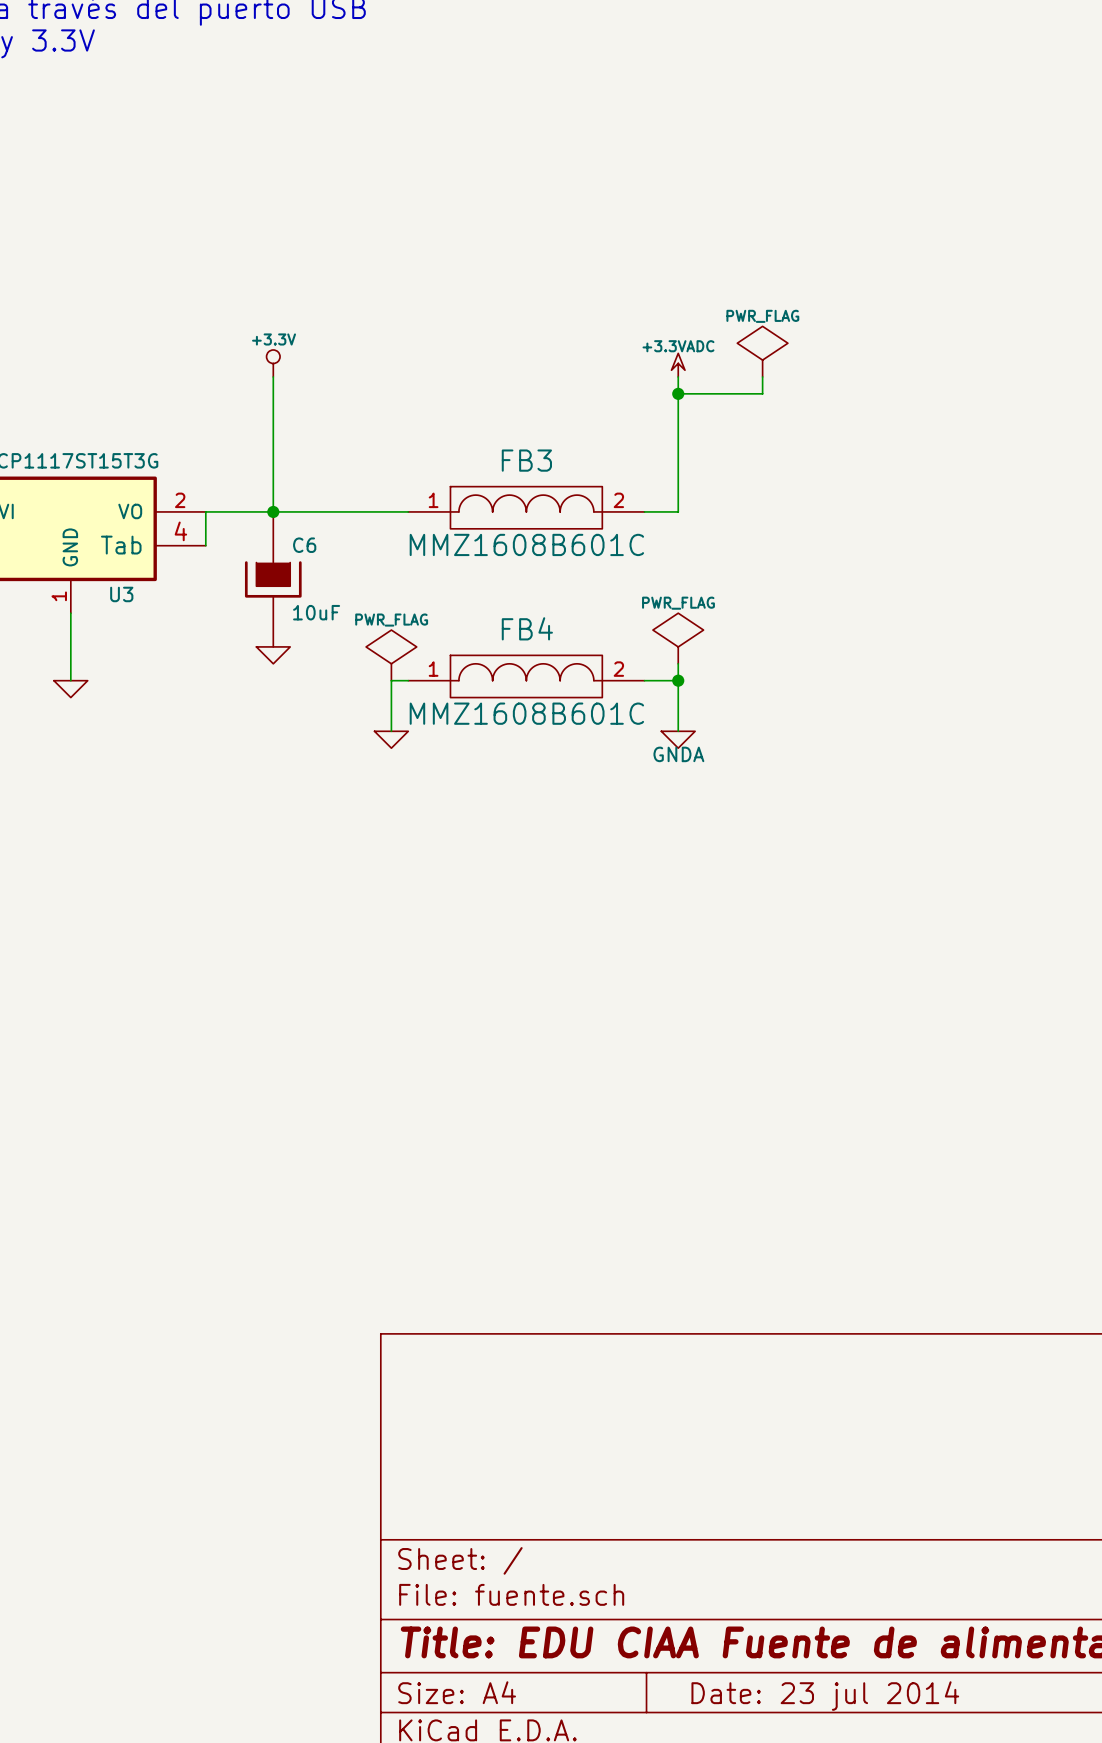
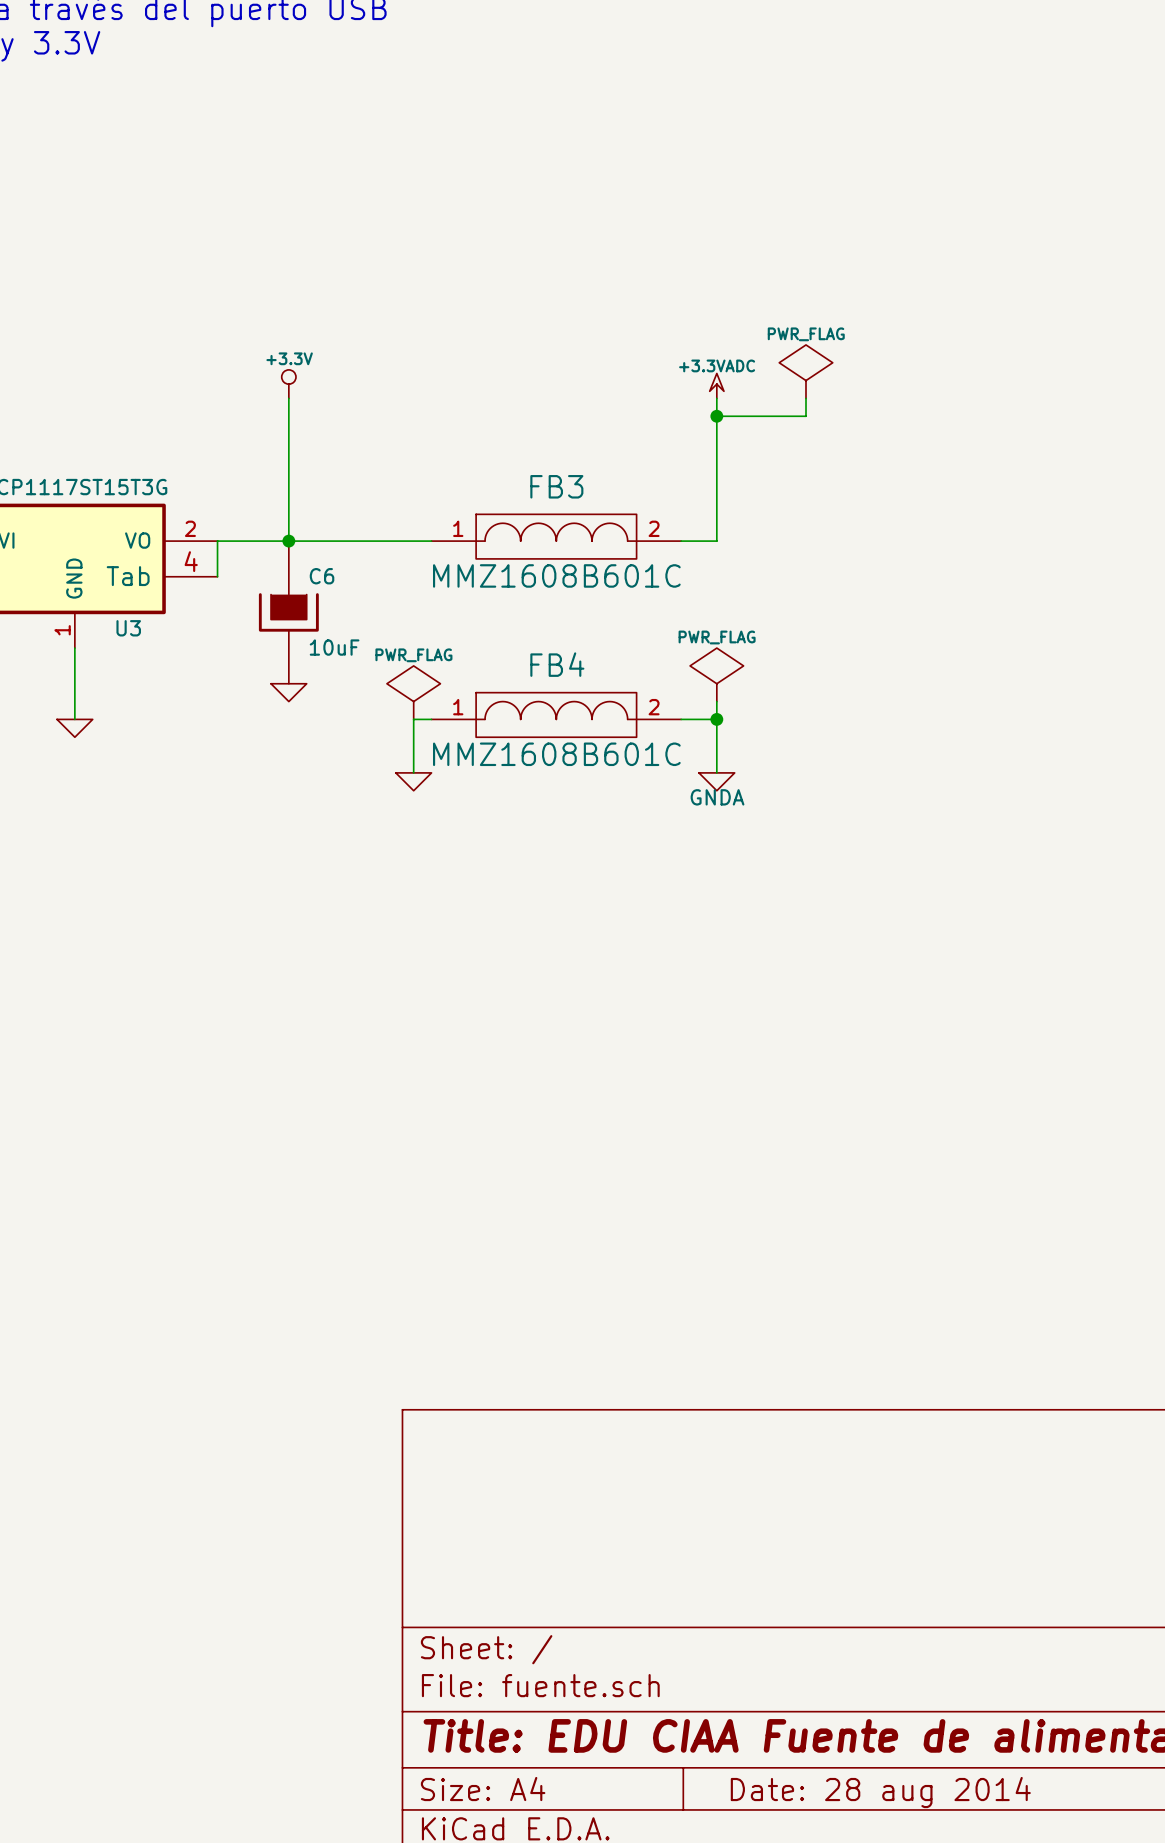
title block: Date: 23 jul 2014 (825, 1696) -> Date: 28 aug 2014 (880, 1792)

